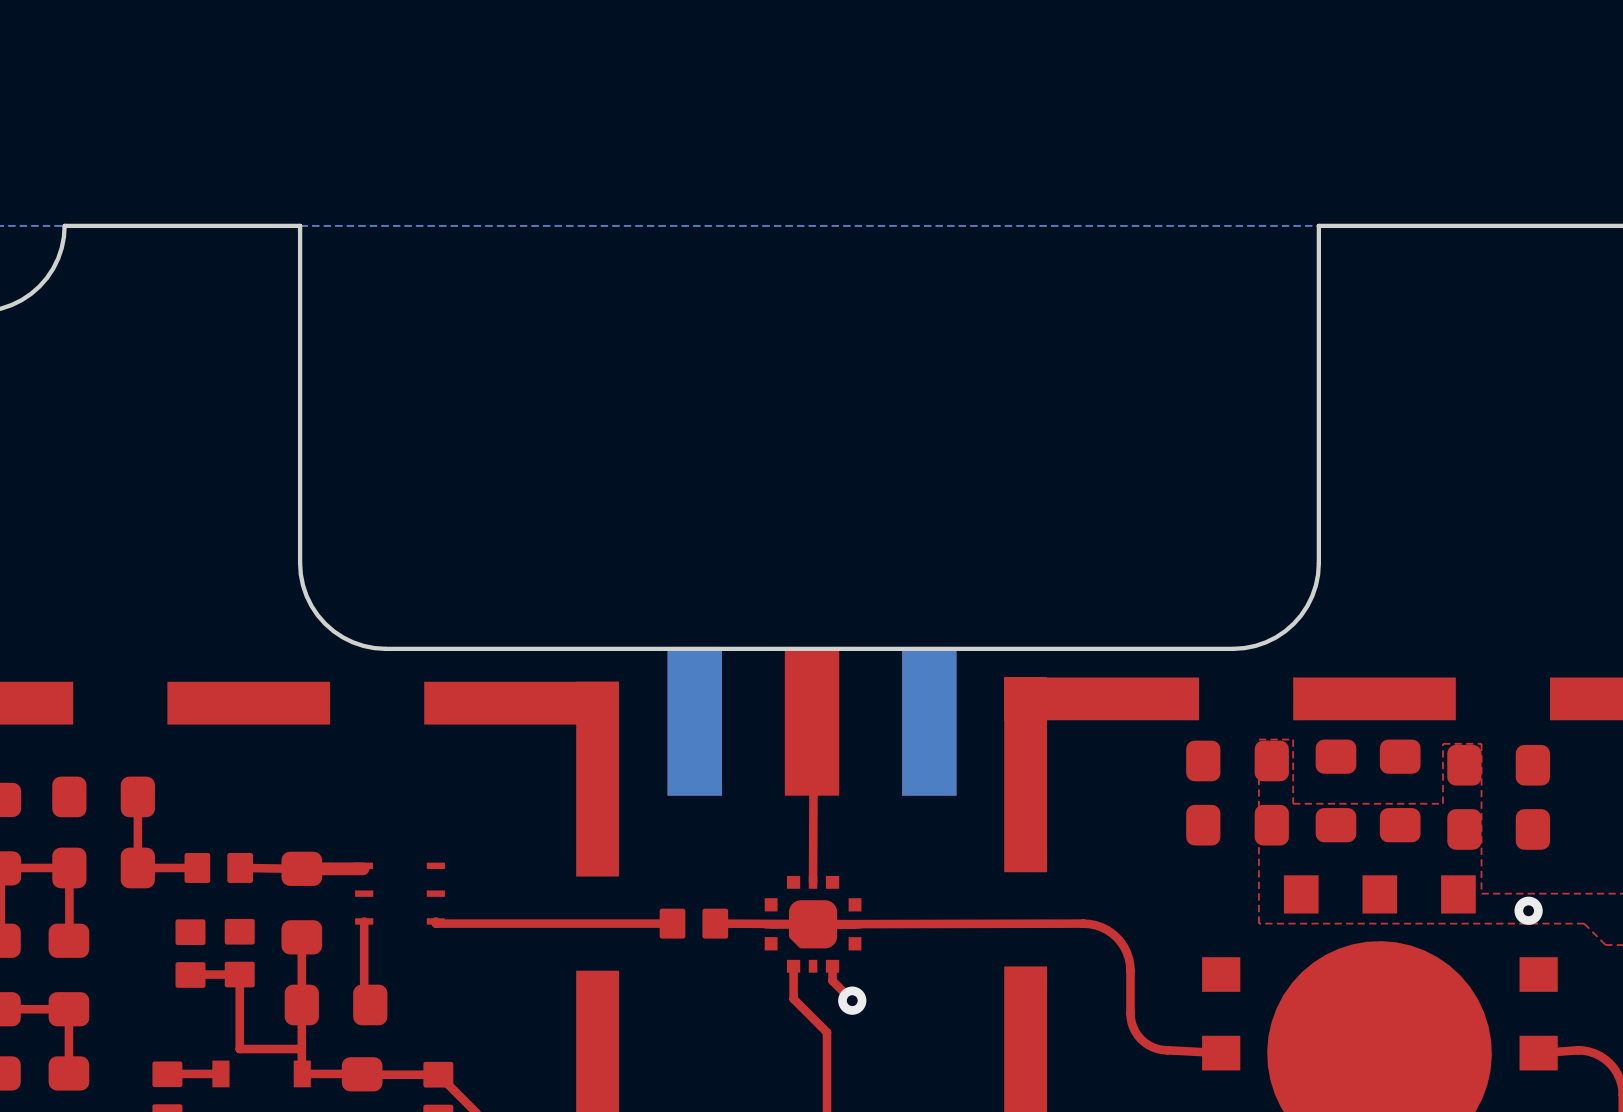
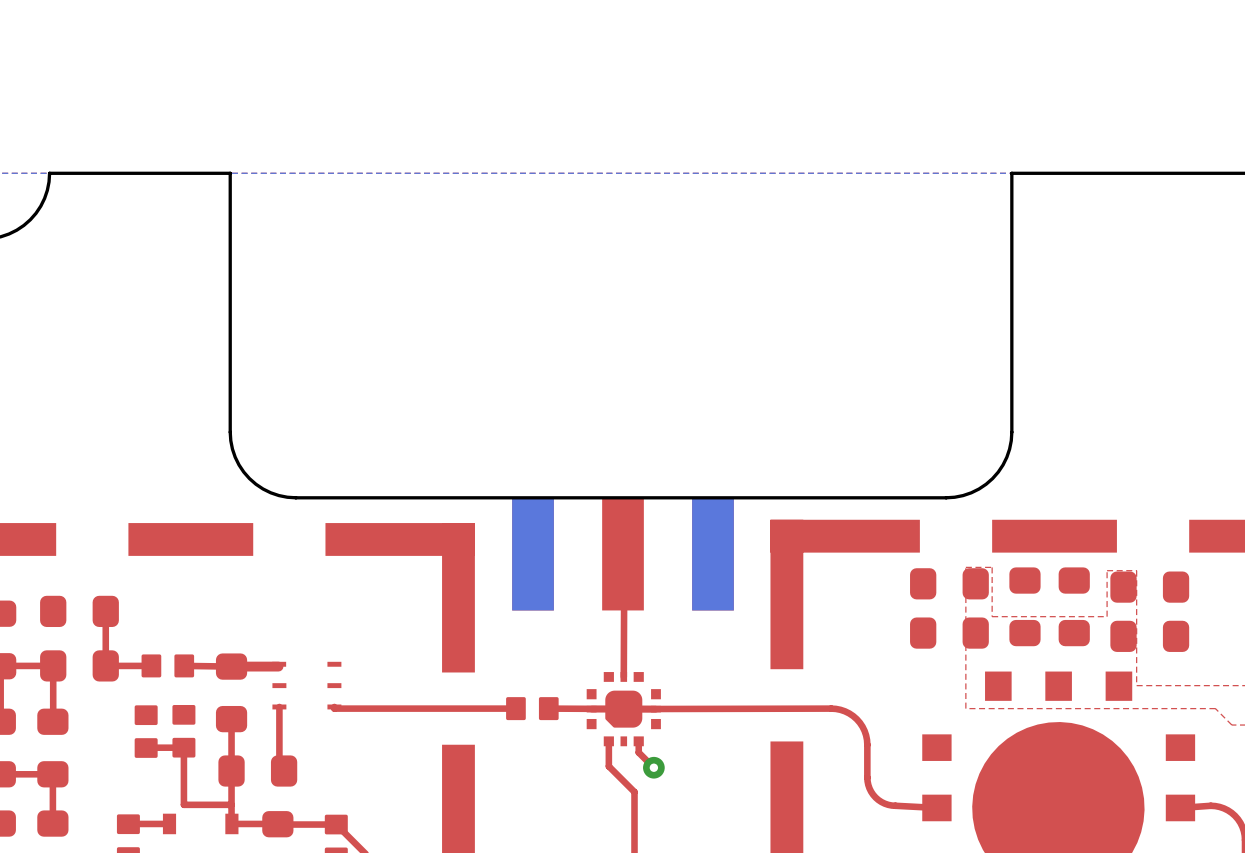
via: (1528, 910) -> none

